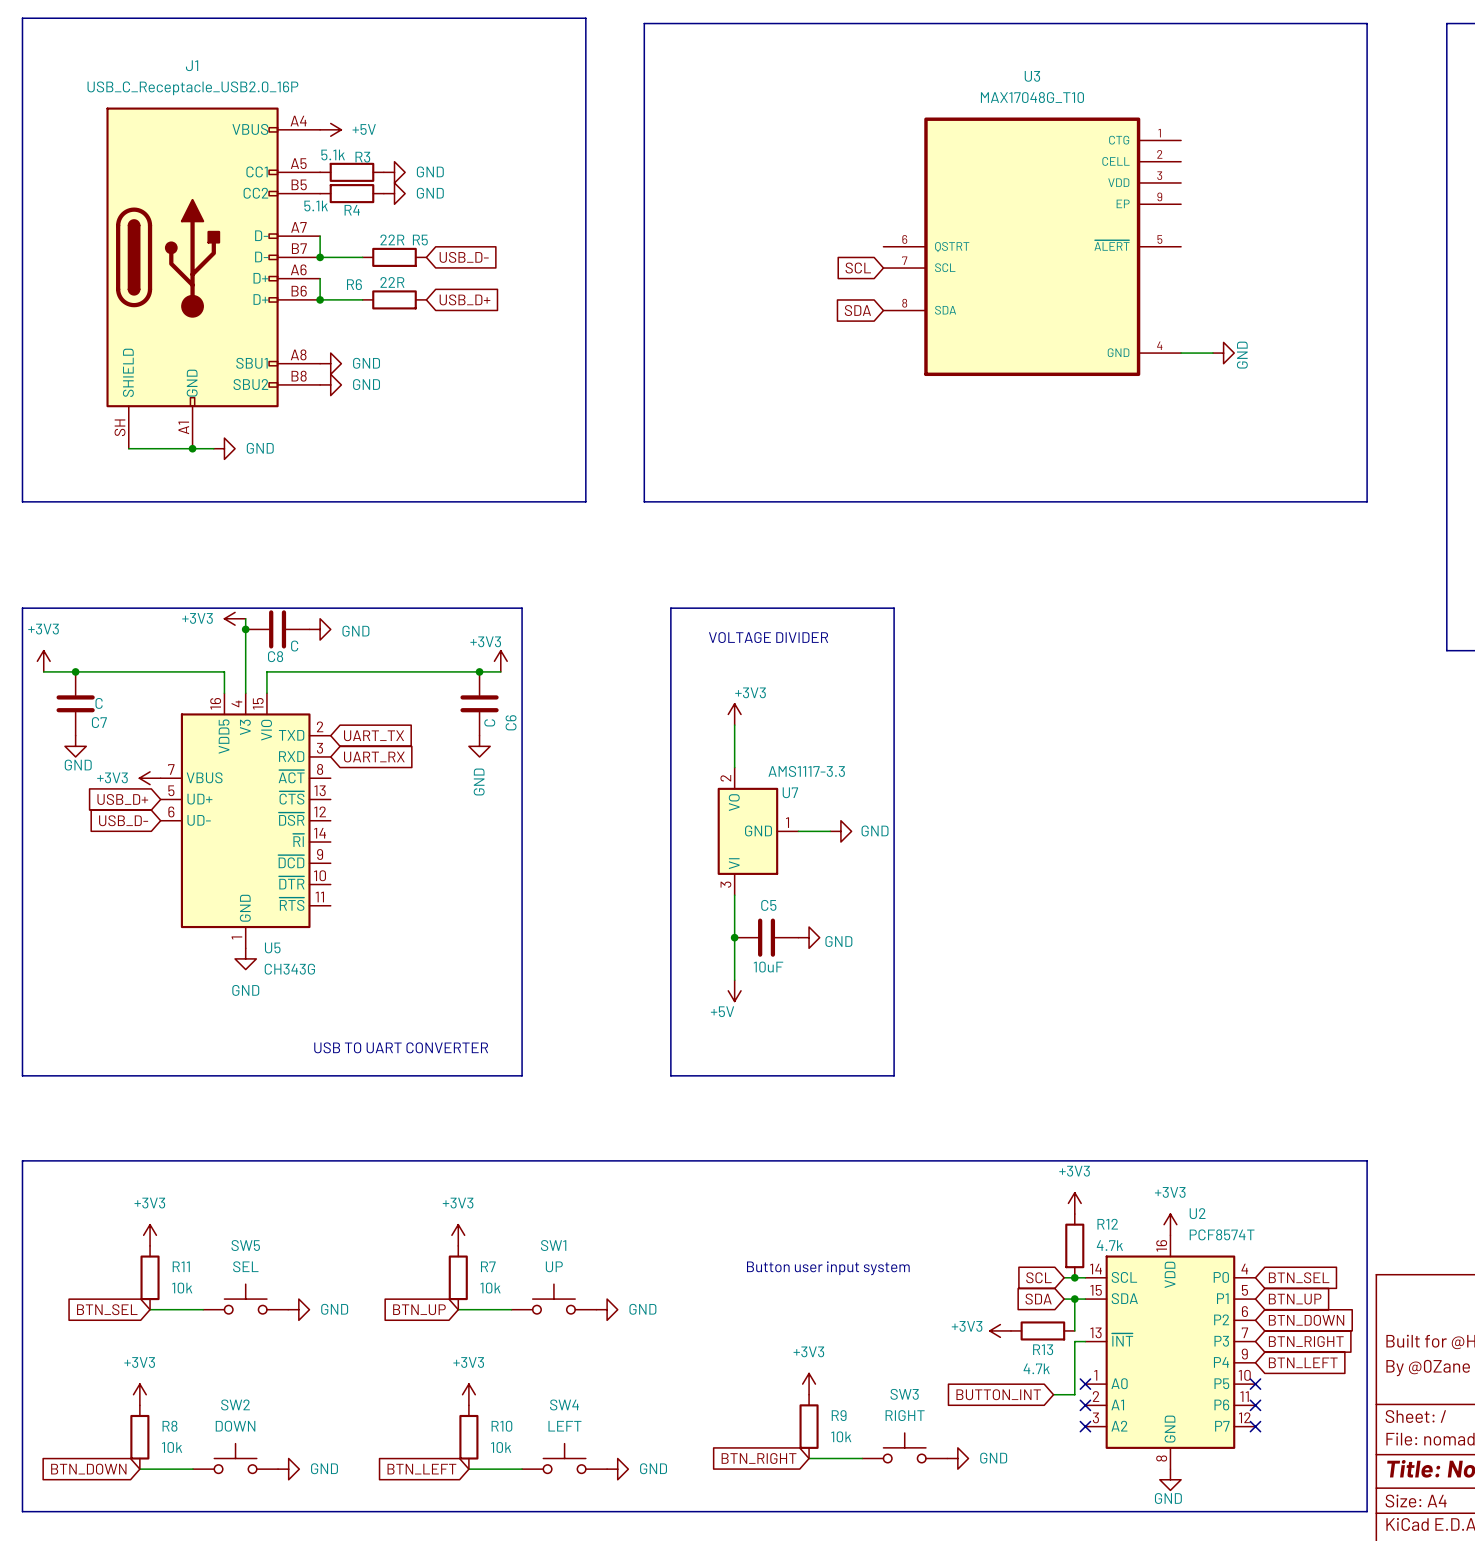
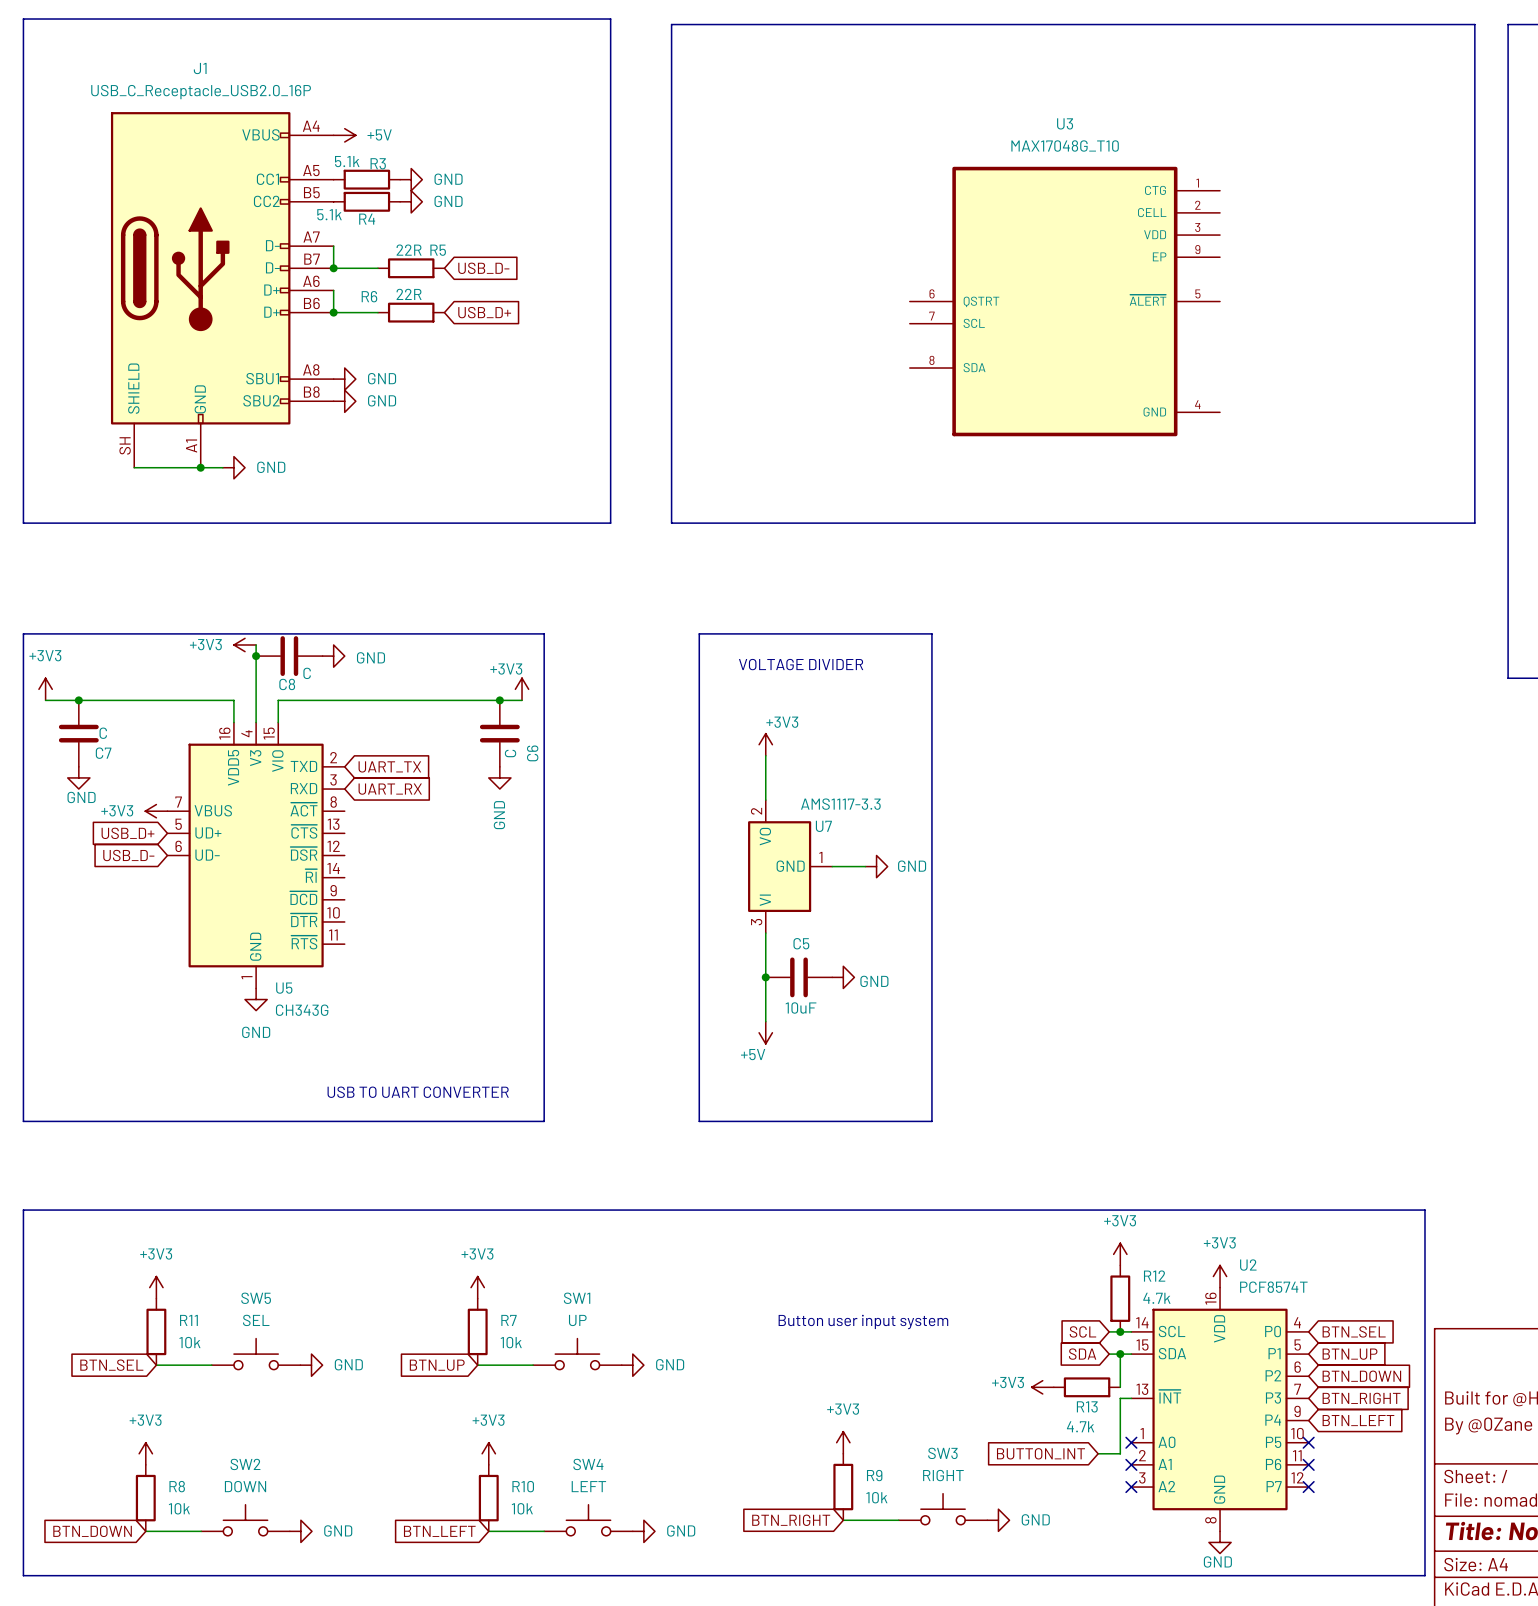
line: (1367, 23) (1367, 501) -> (1424, 24) (1474, 24) (1474, 523) (1424, 523)
U3 position: (1032, 246) -> (1064, 301)
global label: SCL (858, 268) -> none
global label: SDA (857, 310) -> none
wire: (1181, 353) (1212, 353) -> none
power symbol: GND (1223, 353) -> none

